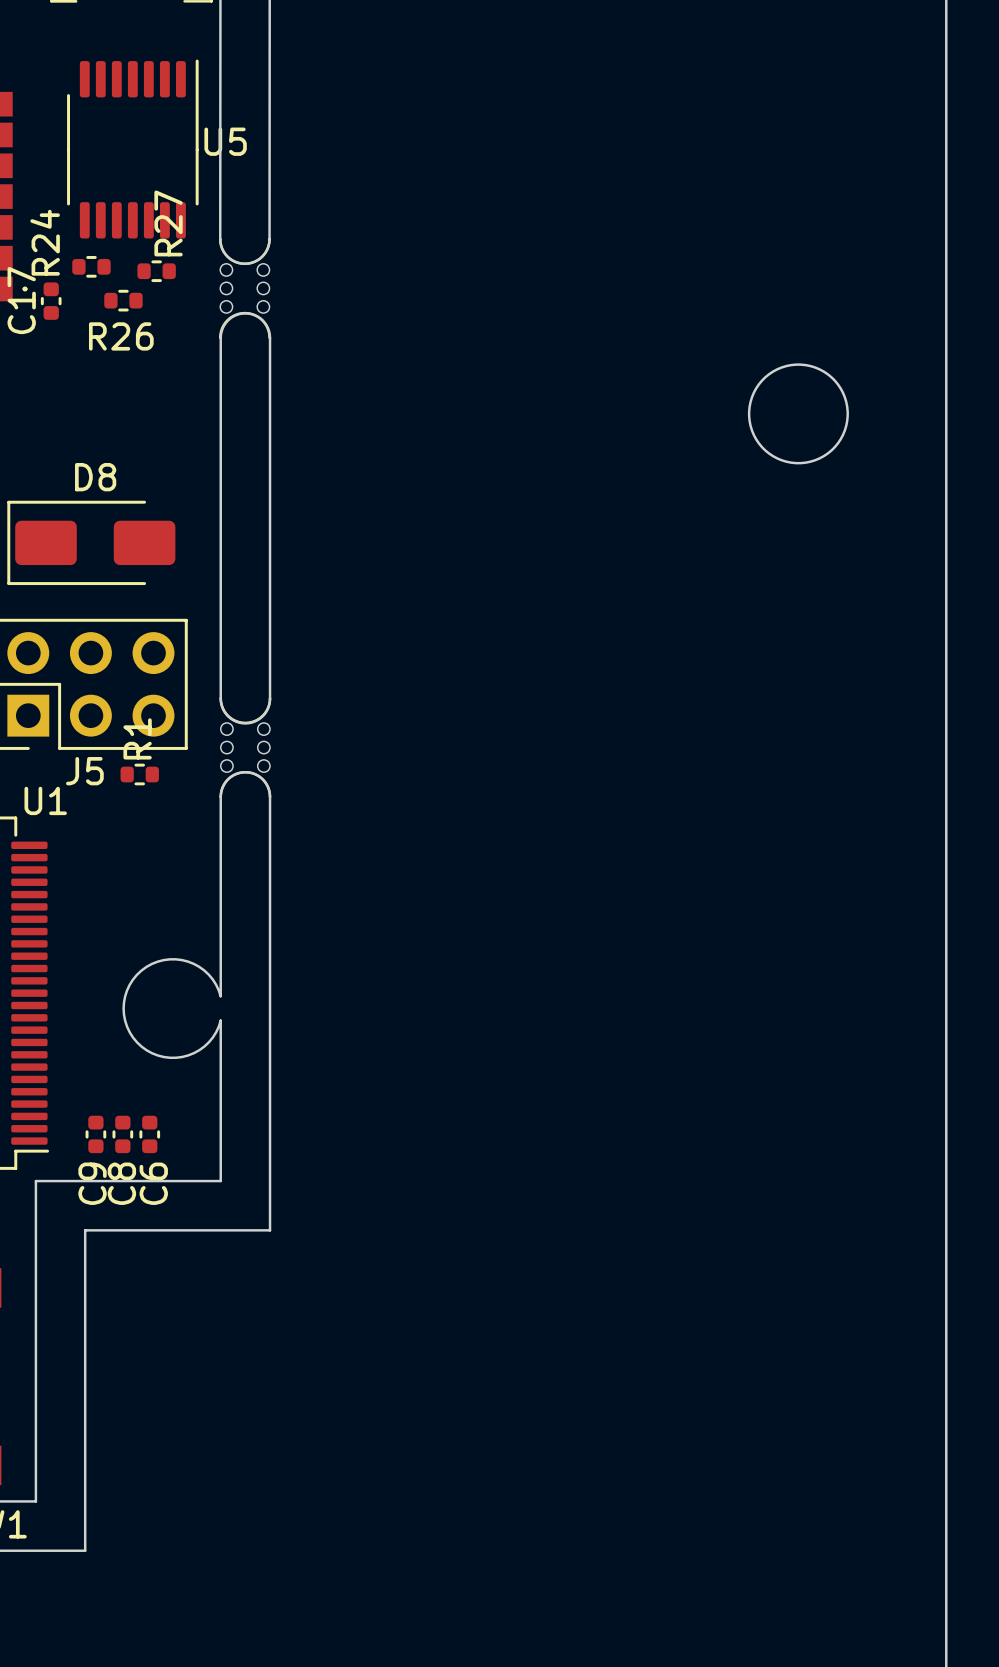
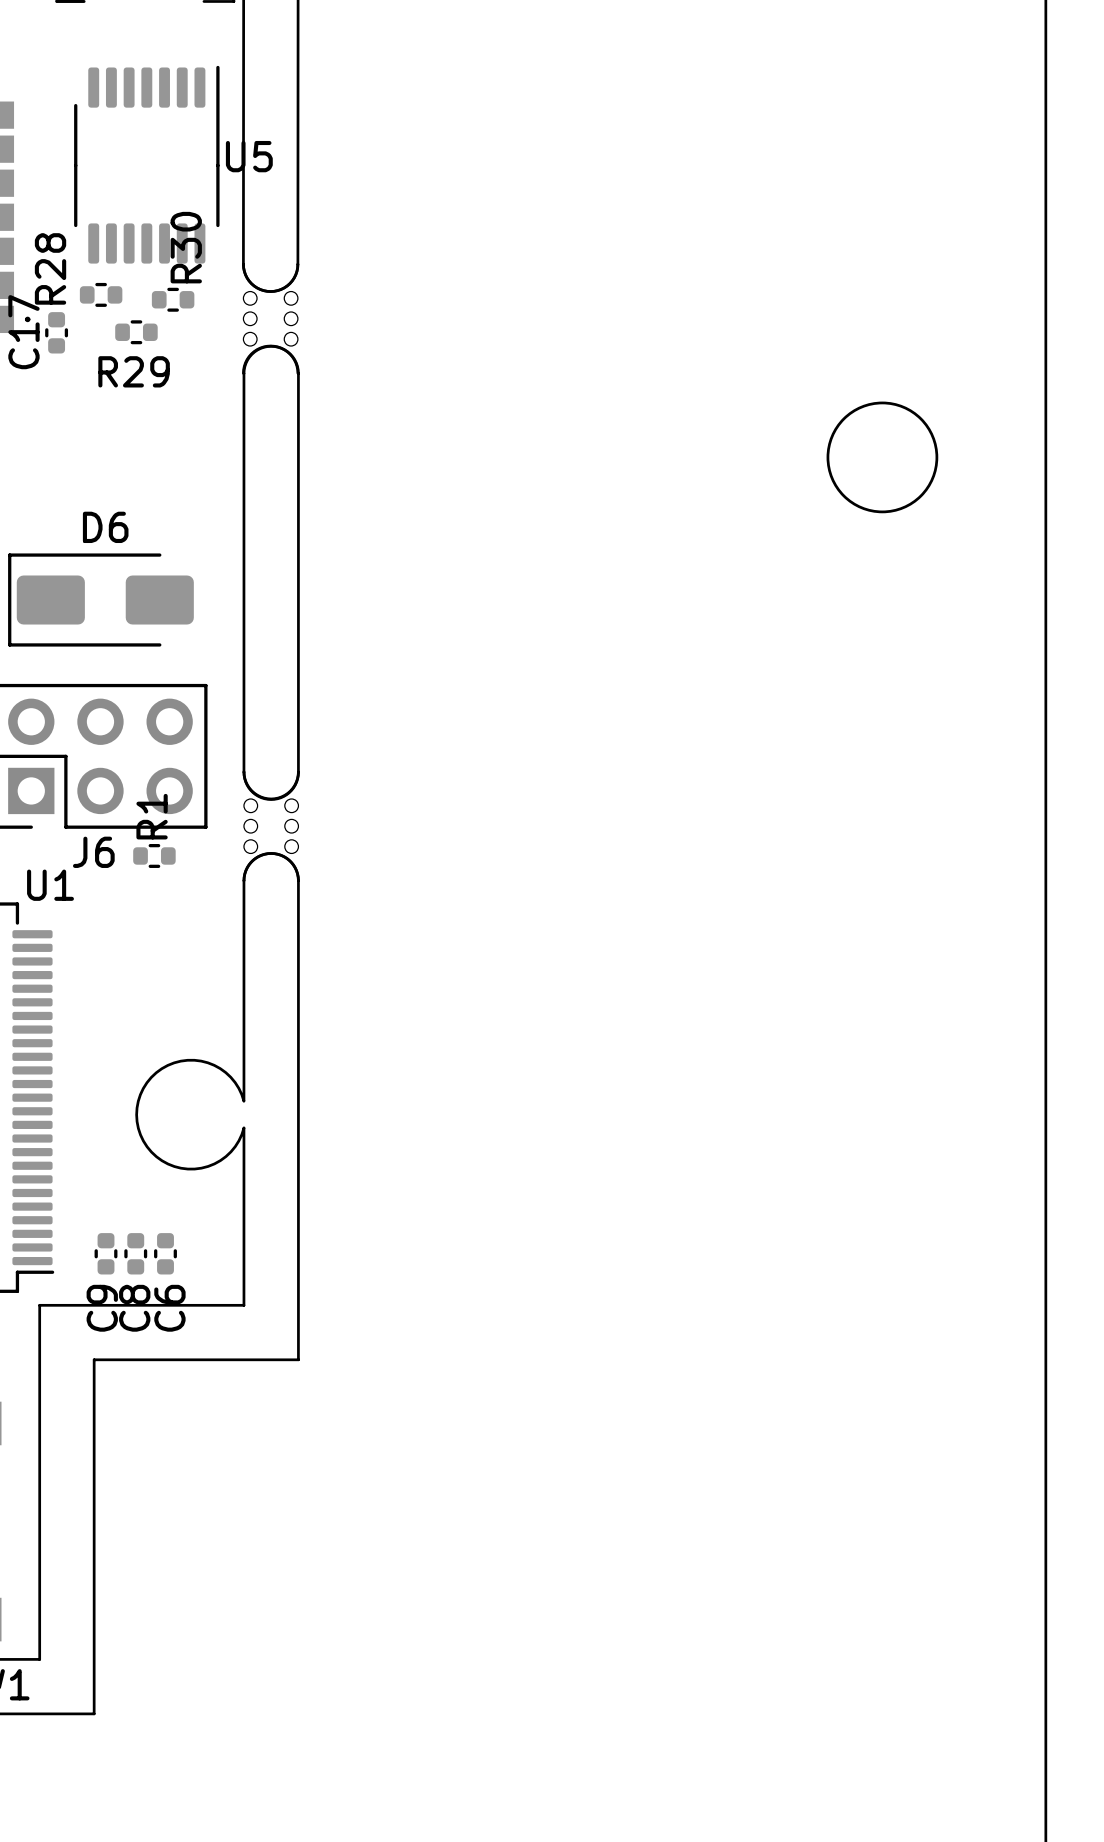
R27 name: R27 (168, 223) -> R30 (186, 247)
R24 name: R24 (45, 242) -> R28 (50, 268)
R26 name: R26 (121, 336) -> R29 (134, 371)
D8 name: D8 (95, 477) -> D6 (105, 527)
J5 name: J5 (84, 771) -> J6 (93, 852)

